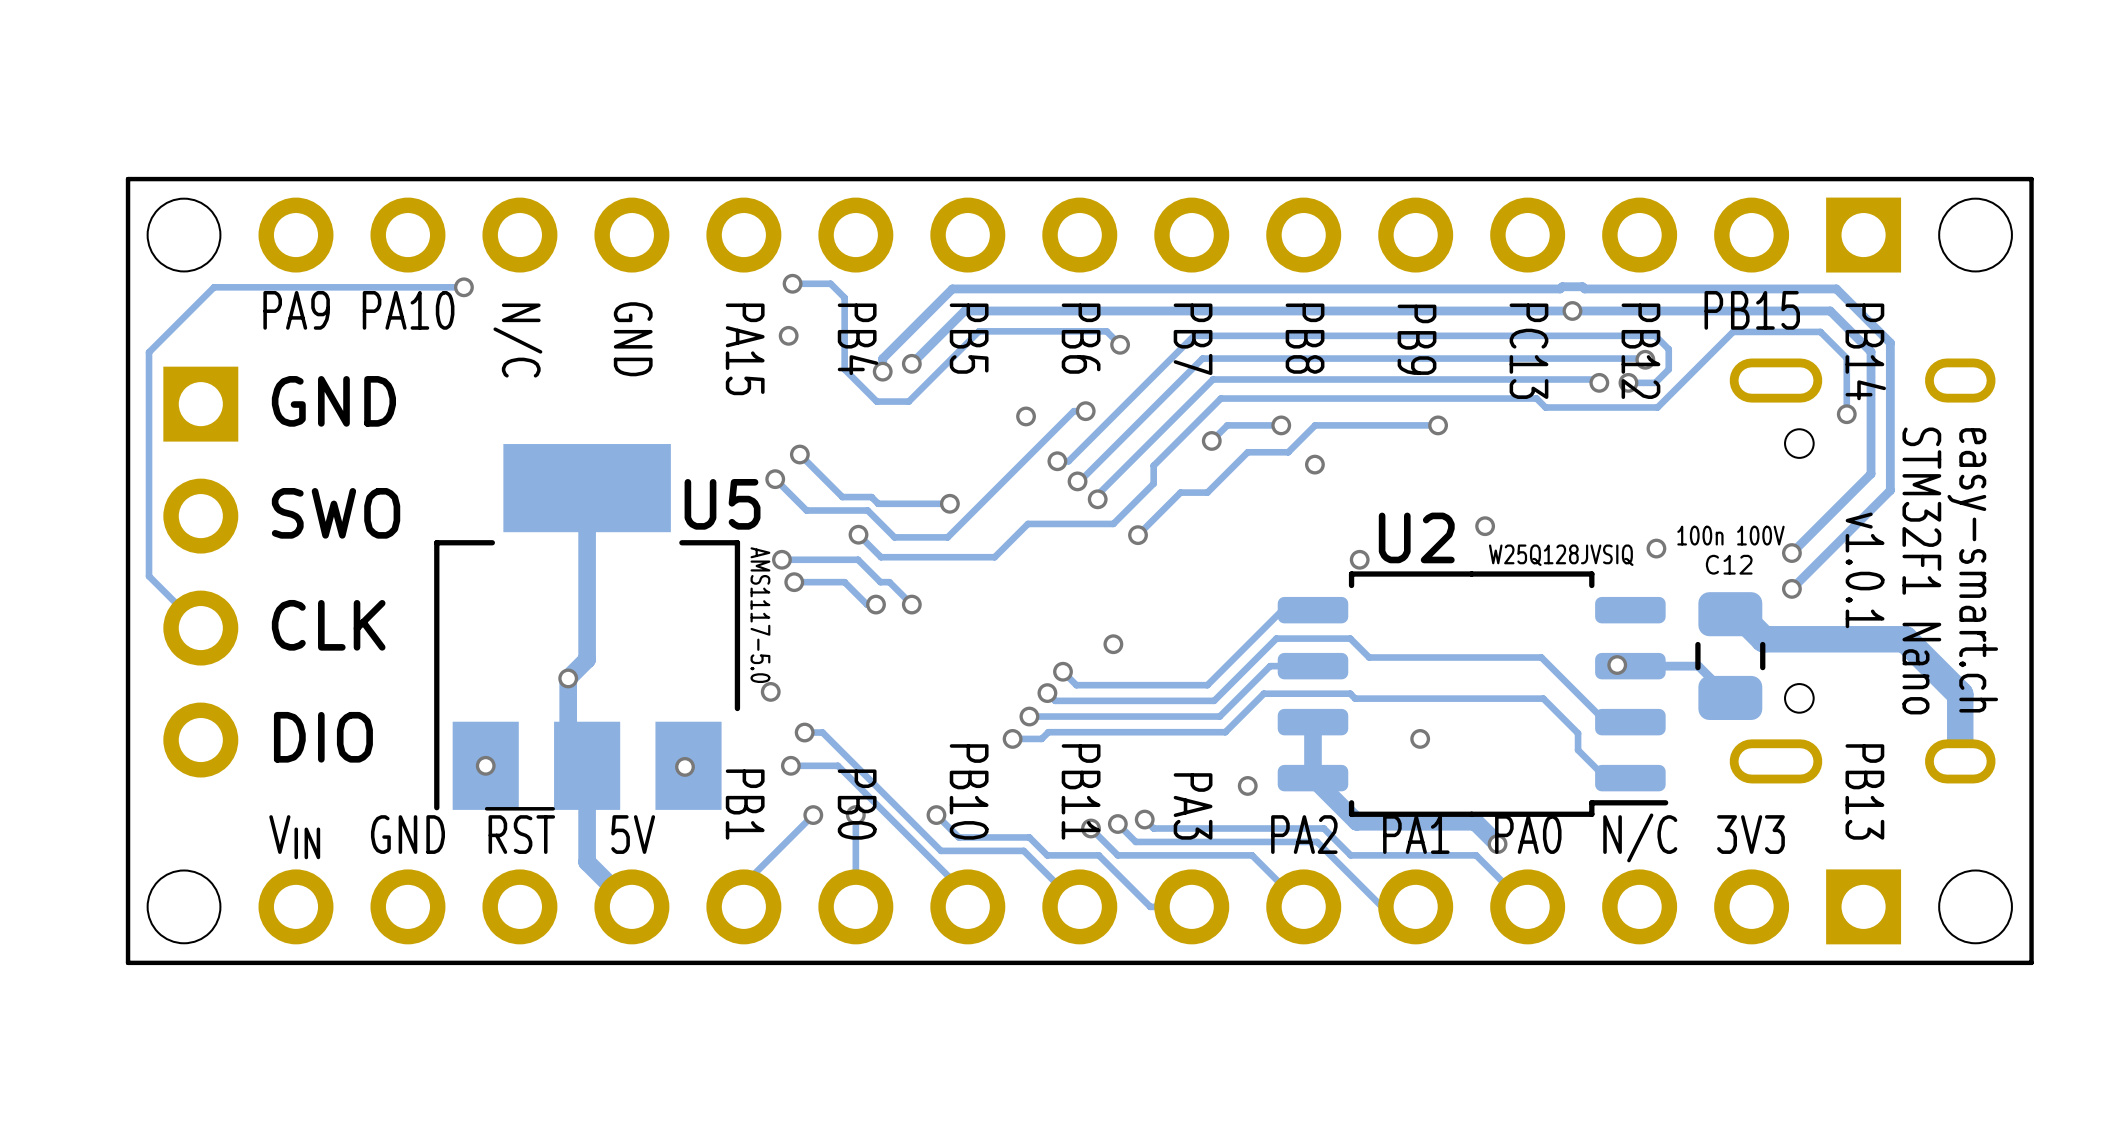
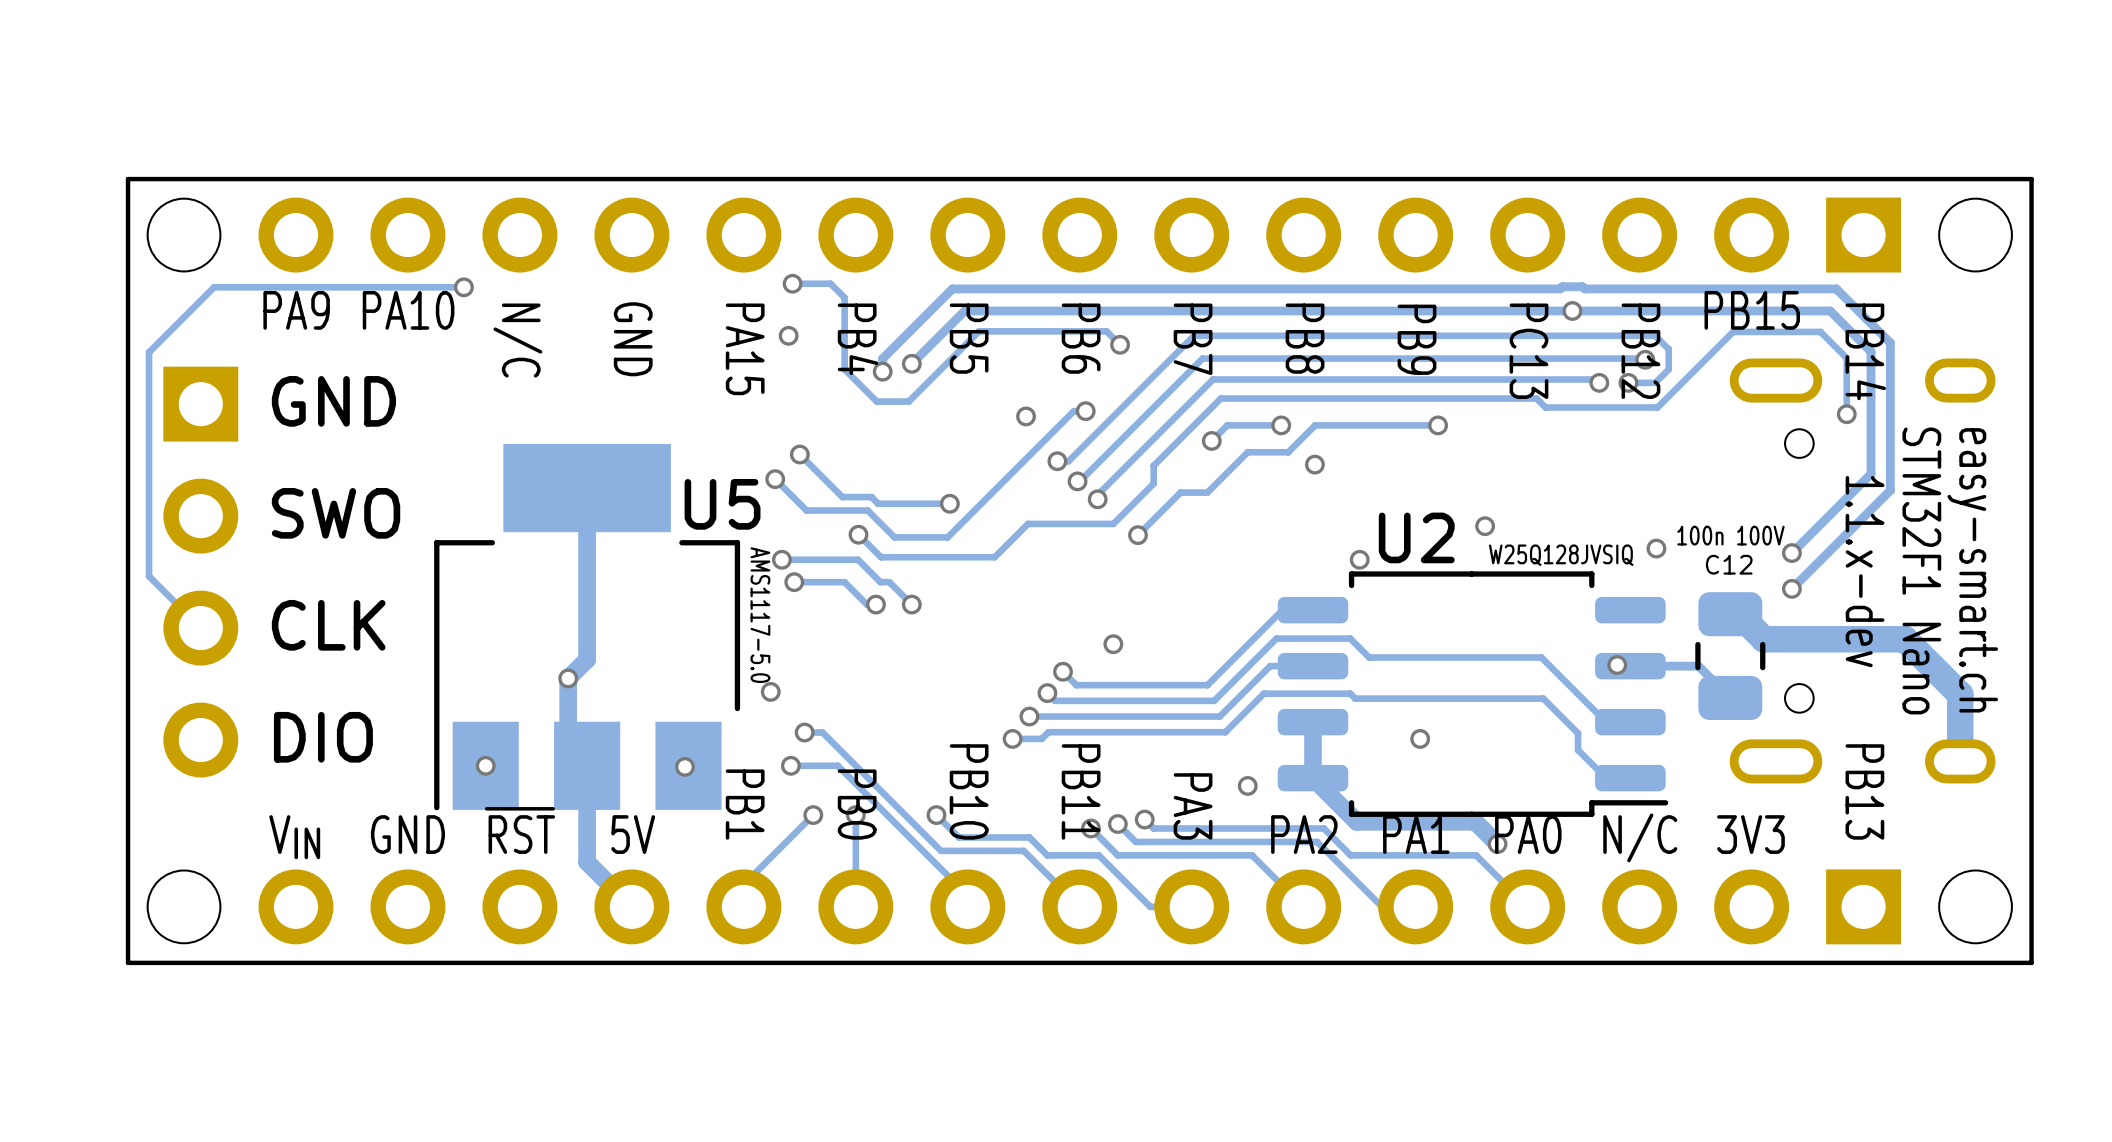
text: v1.0.1 (1865, 570) -> 1.1.x-dev (1865, 571)

